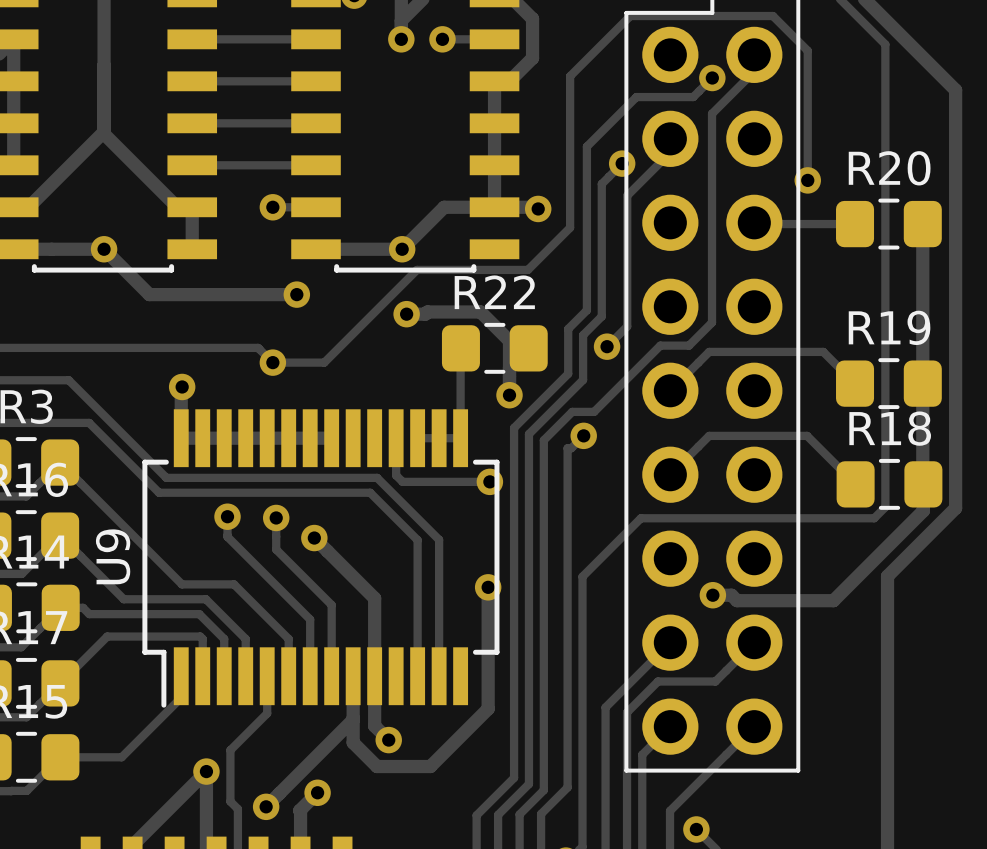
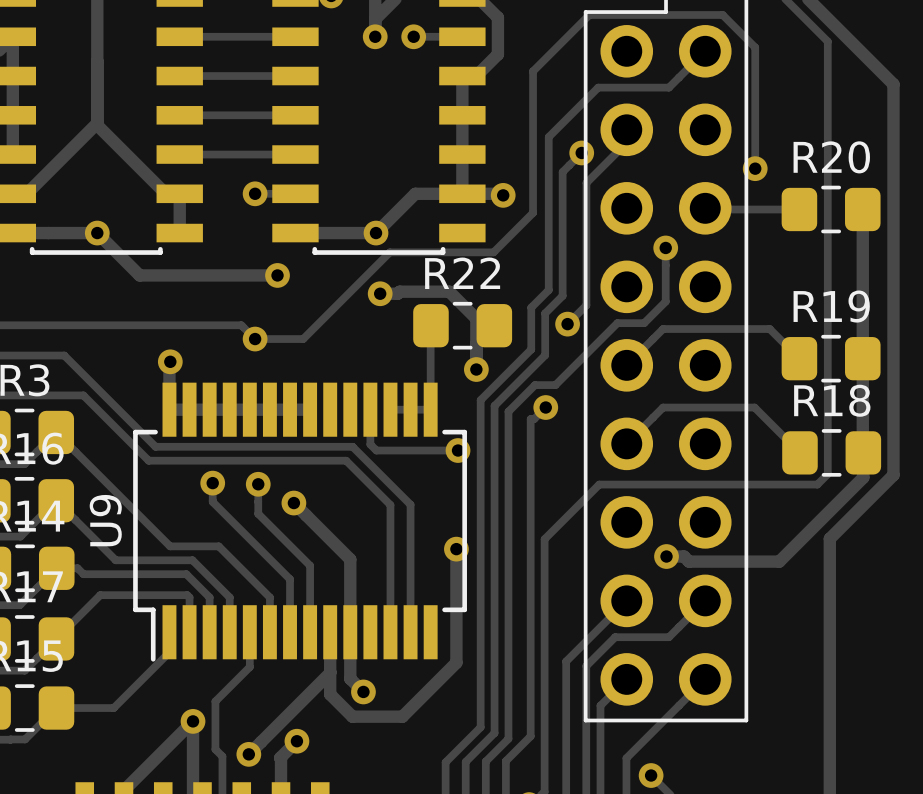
track: (754, 54) (754, 71) (712, 113) (712, 265) -> none
track: (712, 78) (693, 97) (636, 97) -> (705, 51) (668, 87) (598, 87) (595, 90)
via position: (712, 78) -> (665, 247)

